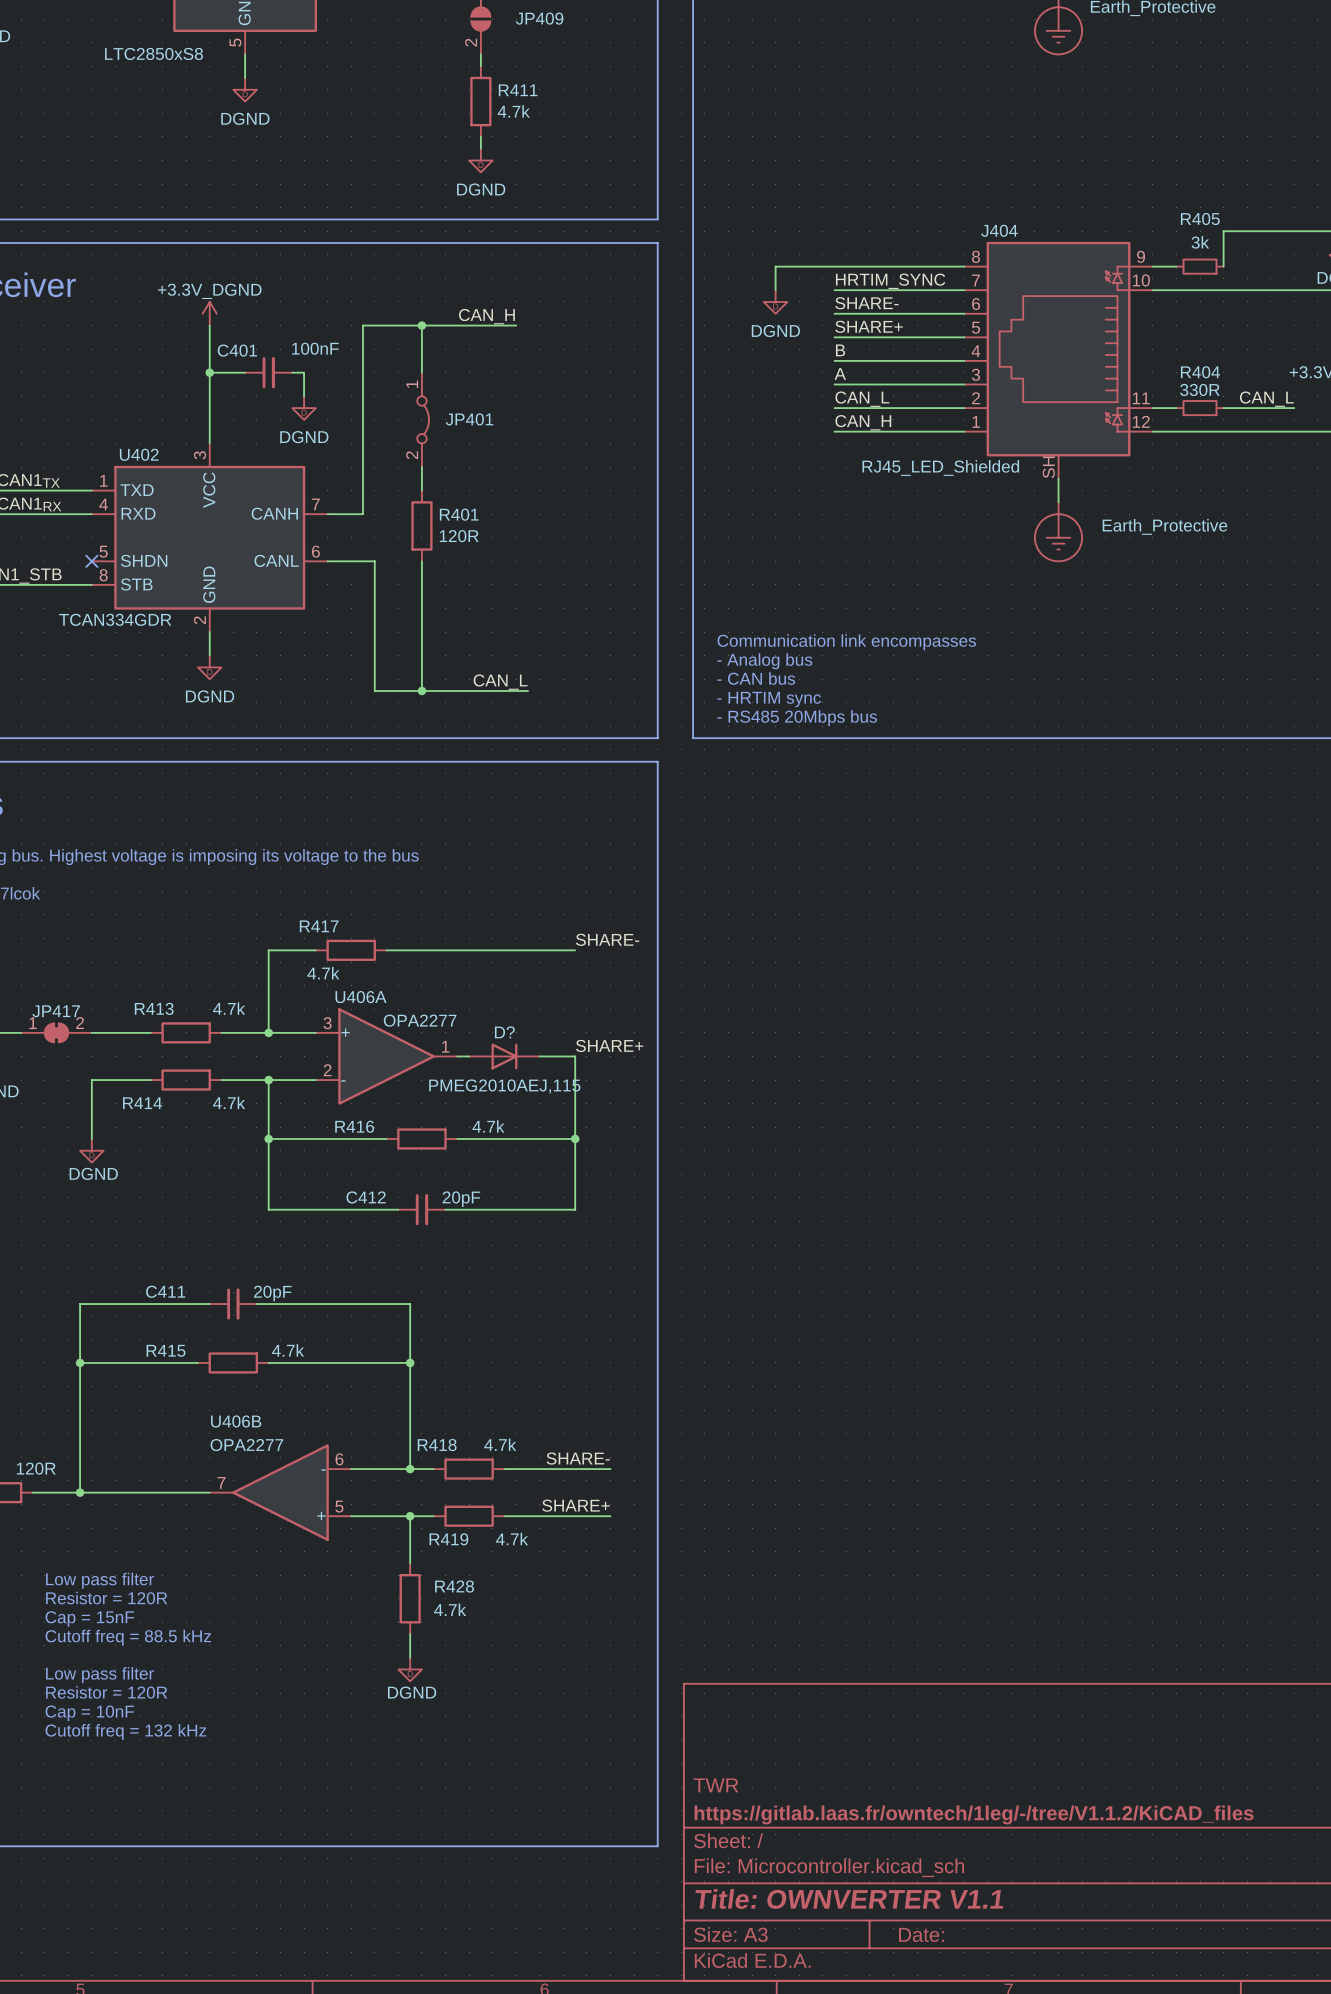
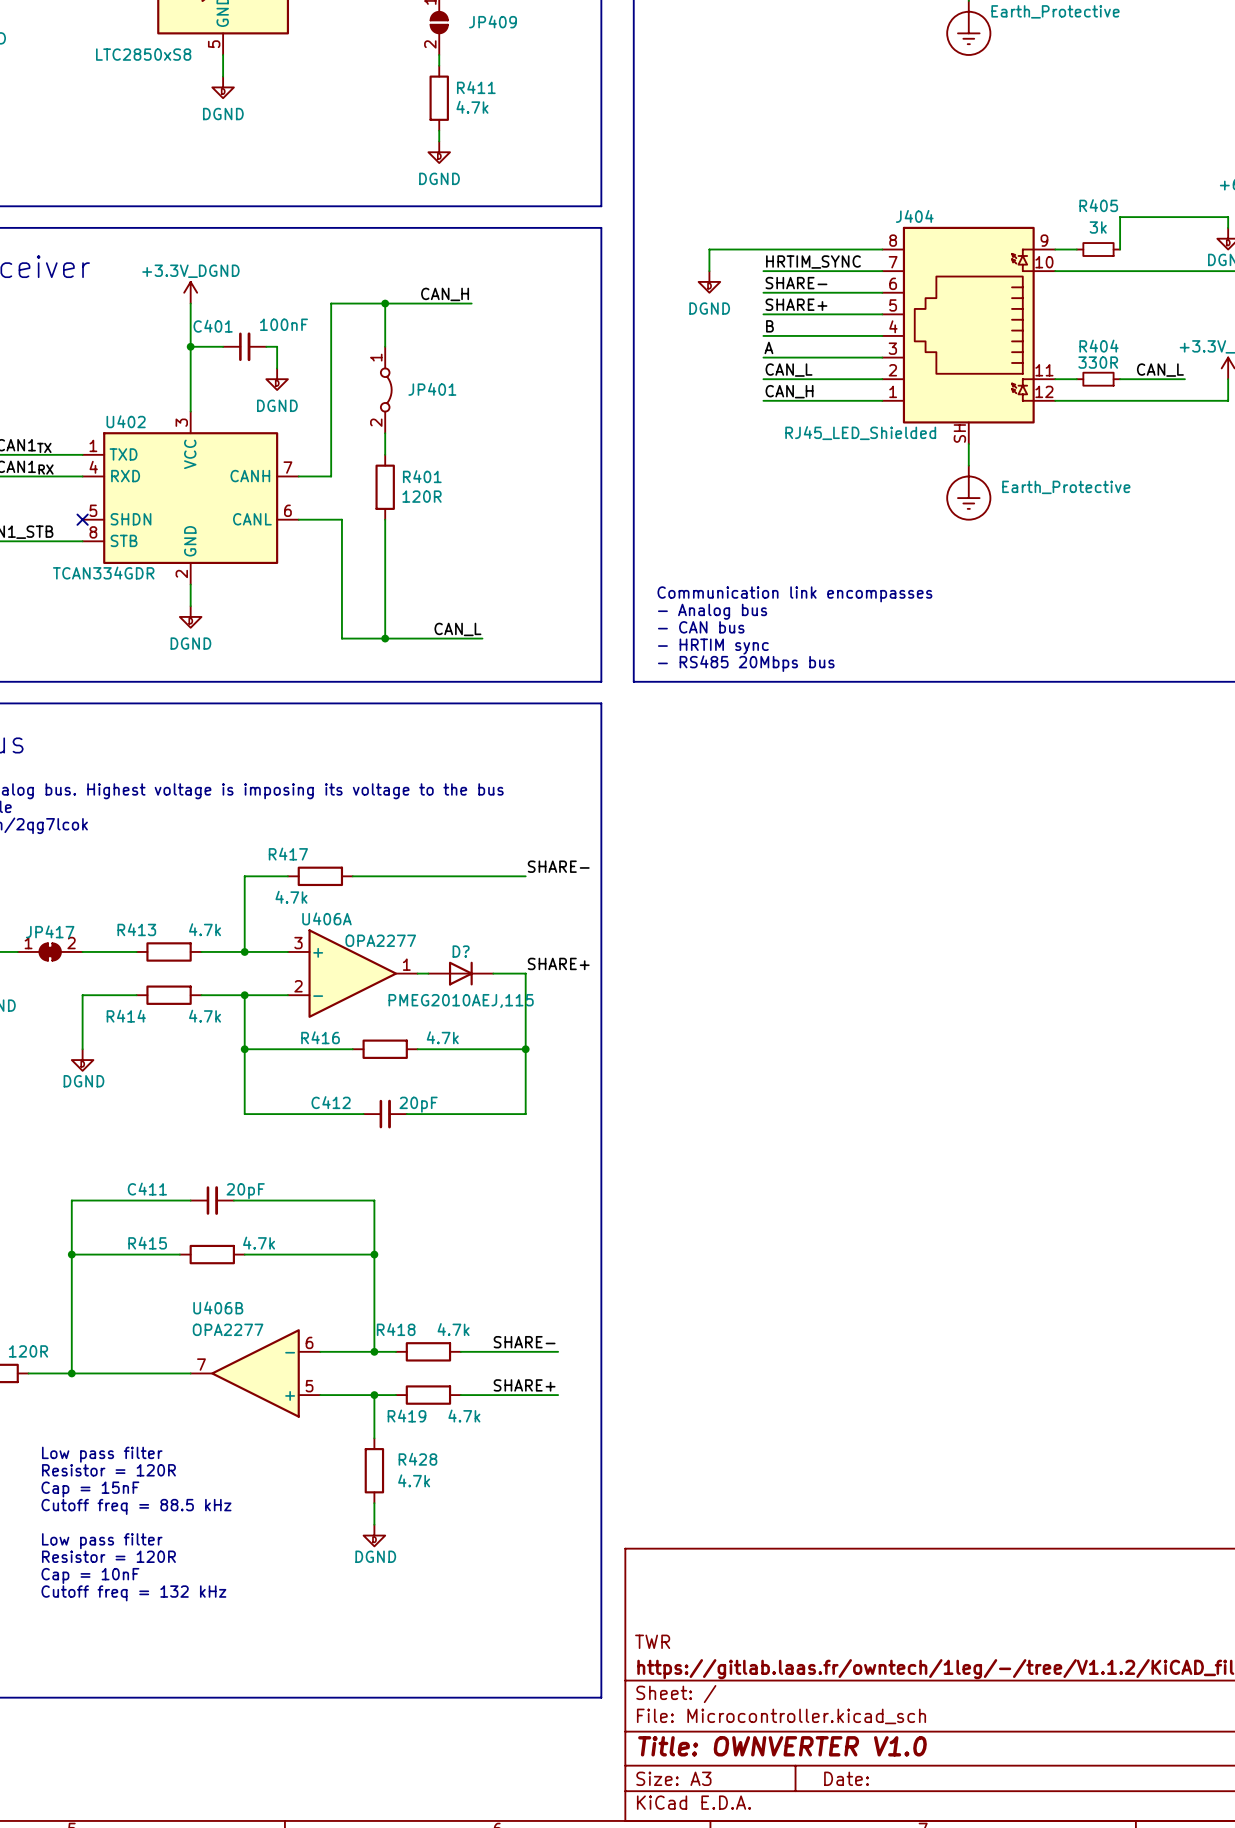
title block: Title: OWNVERTER V1.1 (849, 1899) -> Title: OWNVERTER V1.0 (782, 1746)

